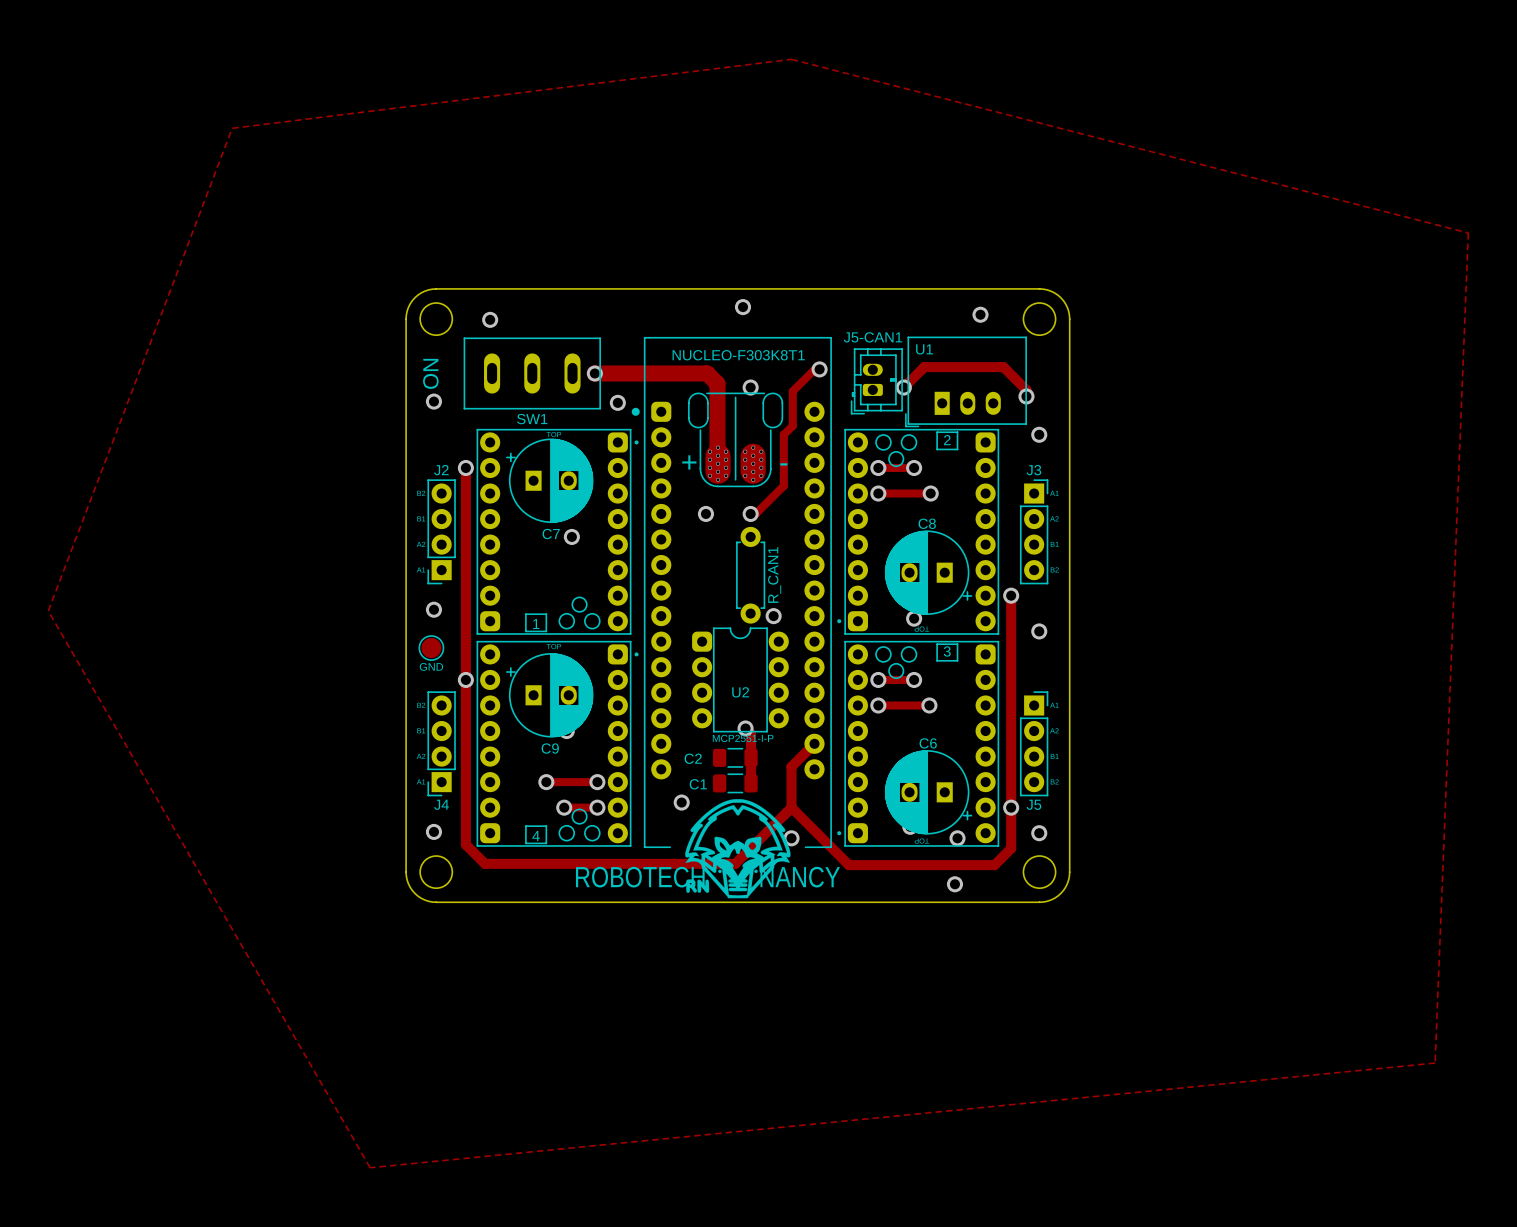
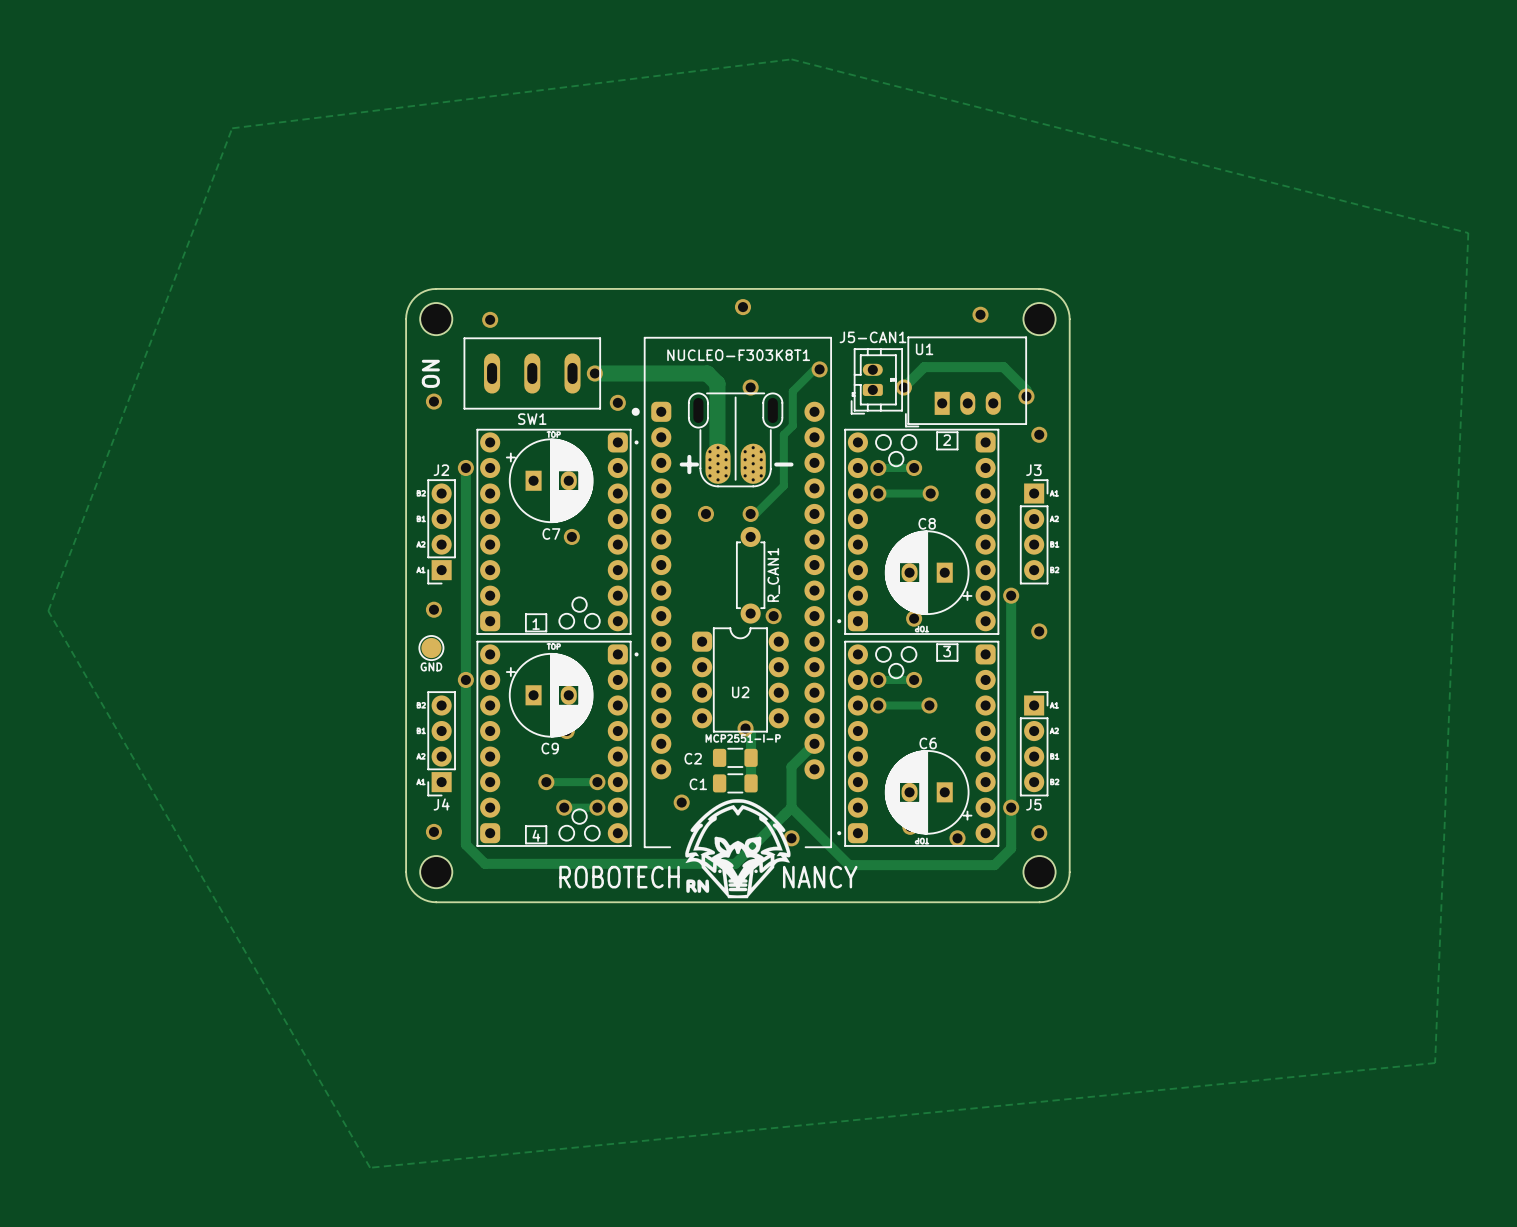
via: (954, 884) -> none

